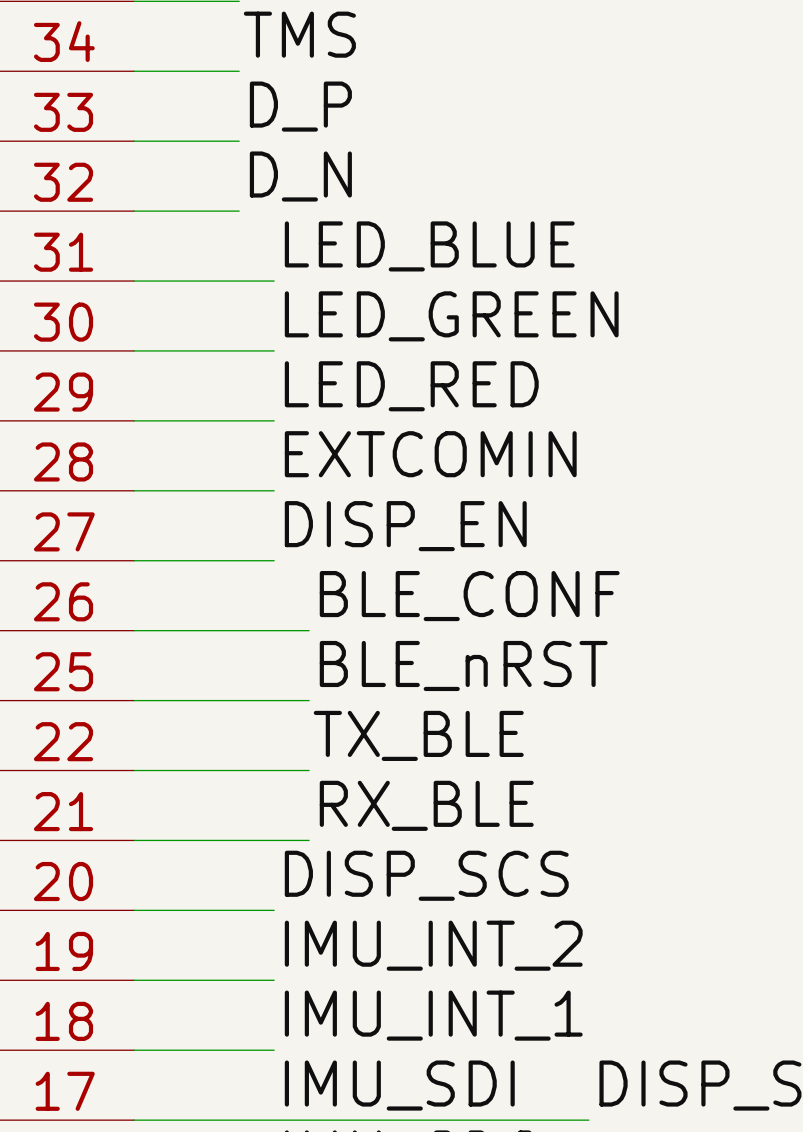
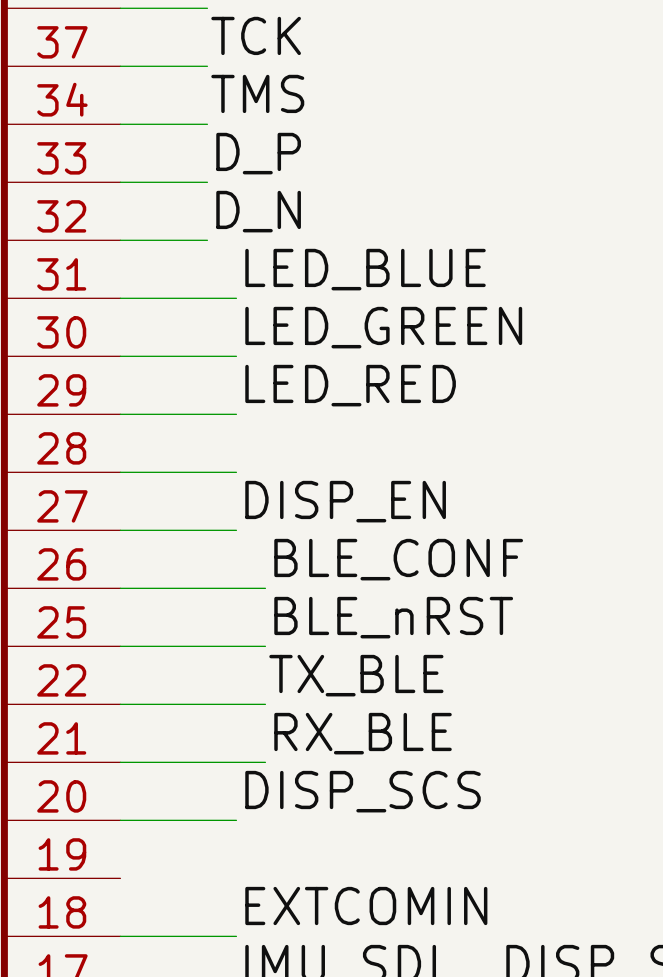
label: EXTCOMIN (430, 454) -> none
label: IMU_INT_2 (433, 945) -> none
wire: (134, 980) (274, 980) -> none
label: IMU_INT_1 (433, 1015) -> EXTCOMIN (366, 906)

